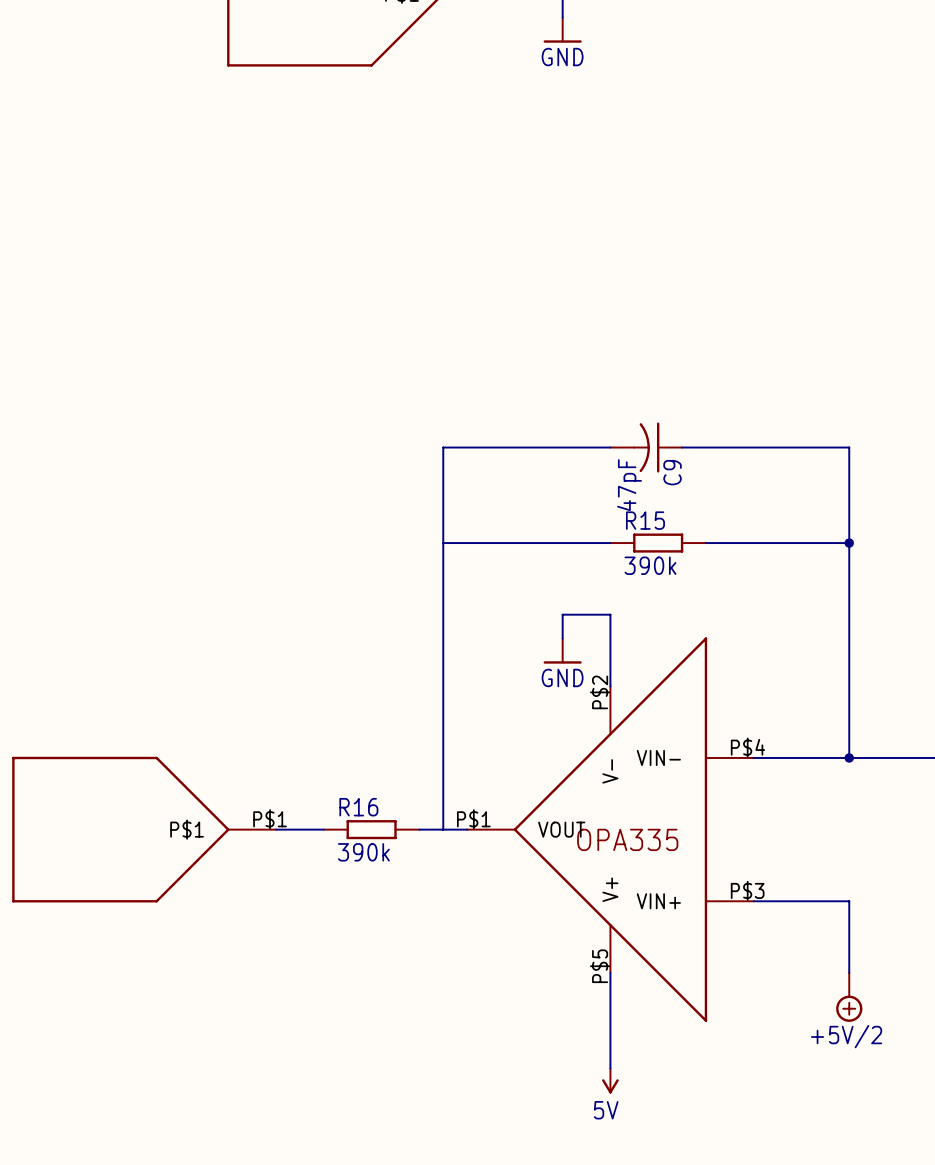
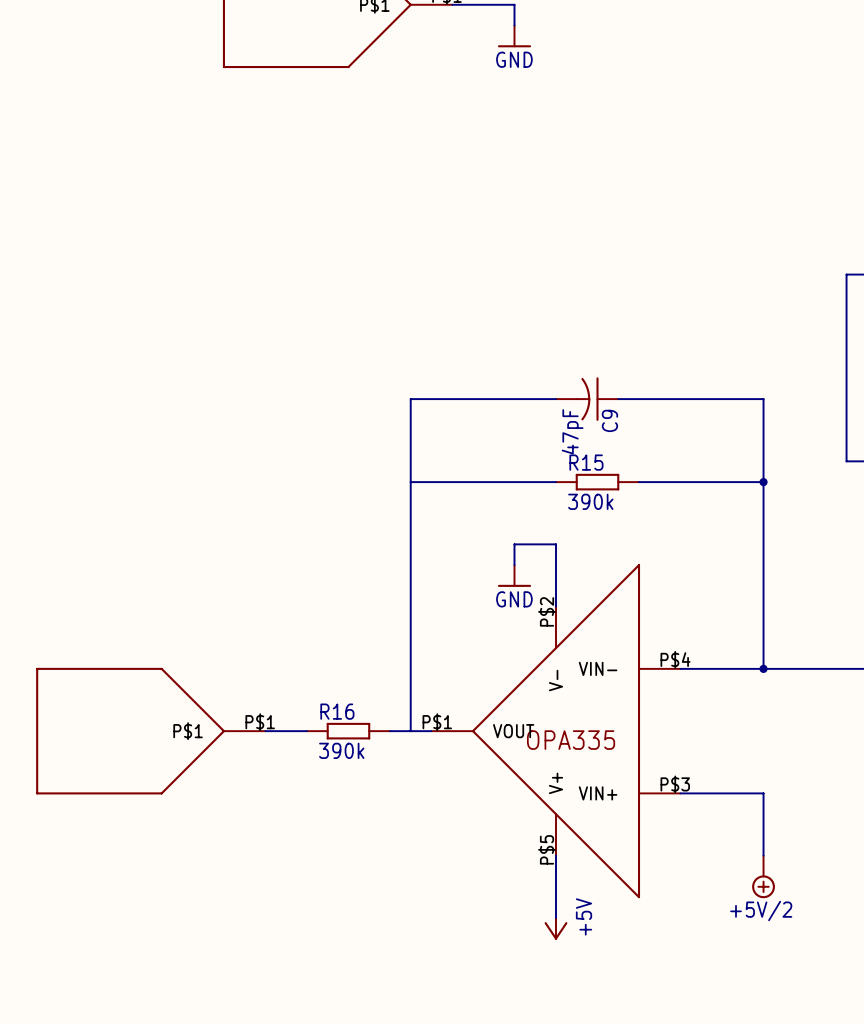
power symbol: none -> +5V (556, 928)
power symbol: 5V (610, 1080) -> none

